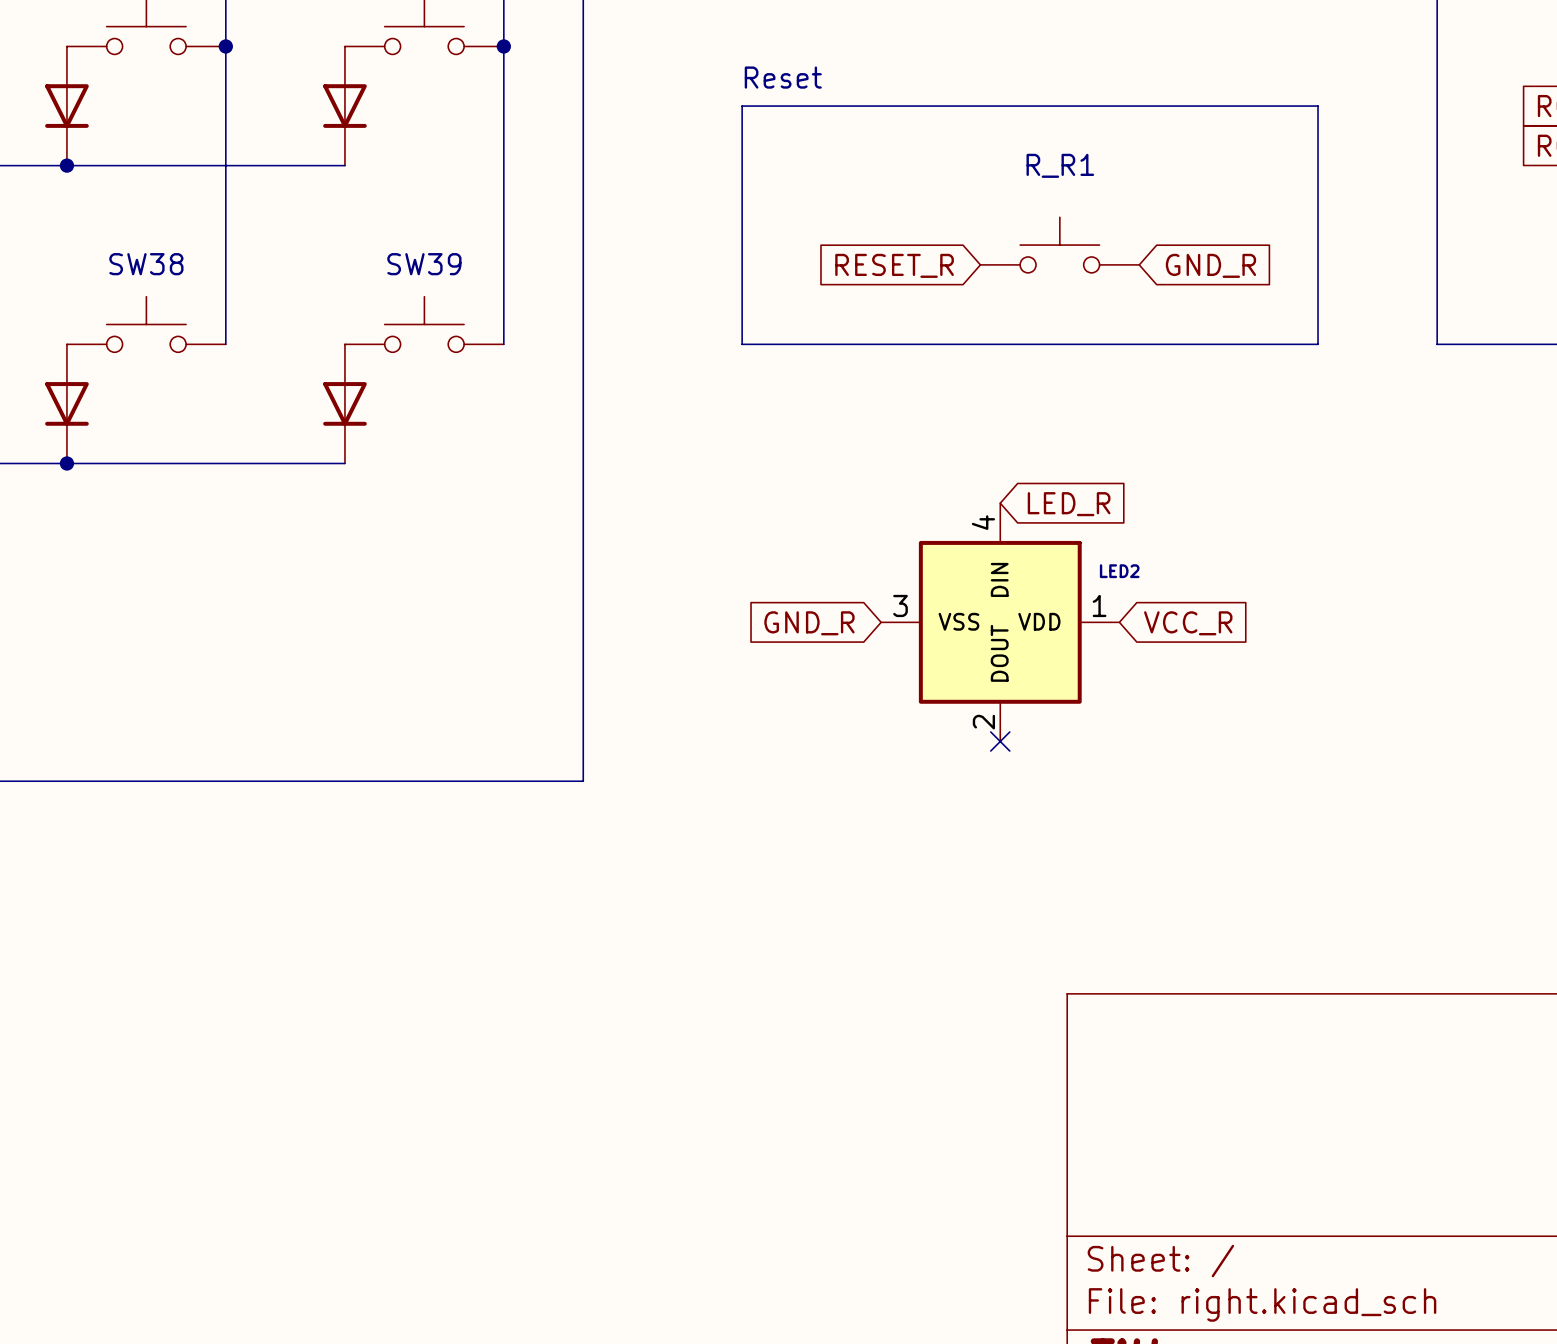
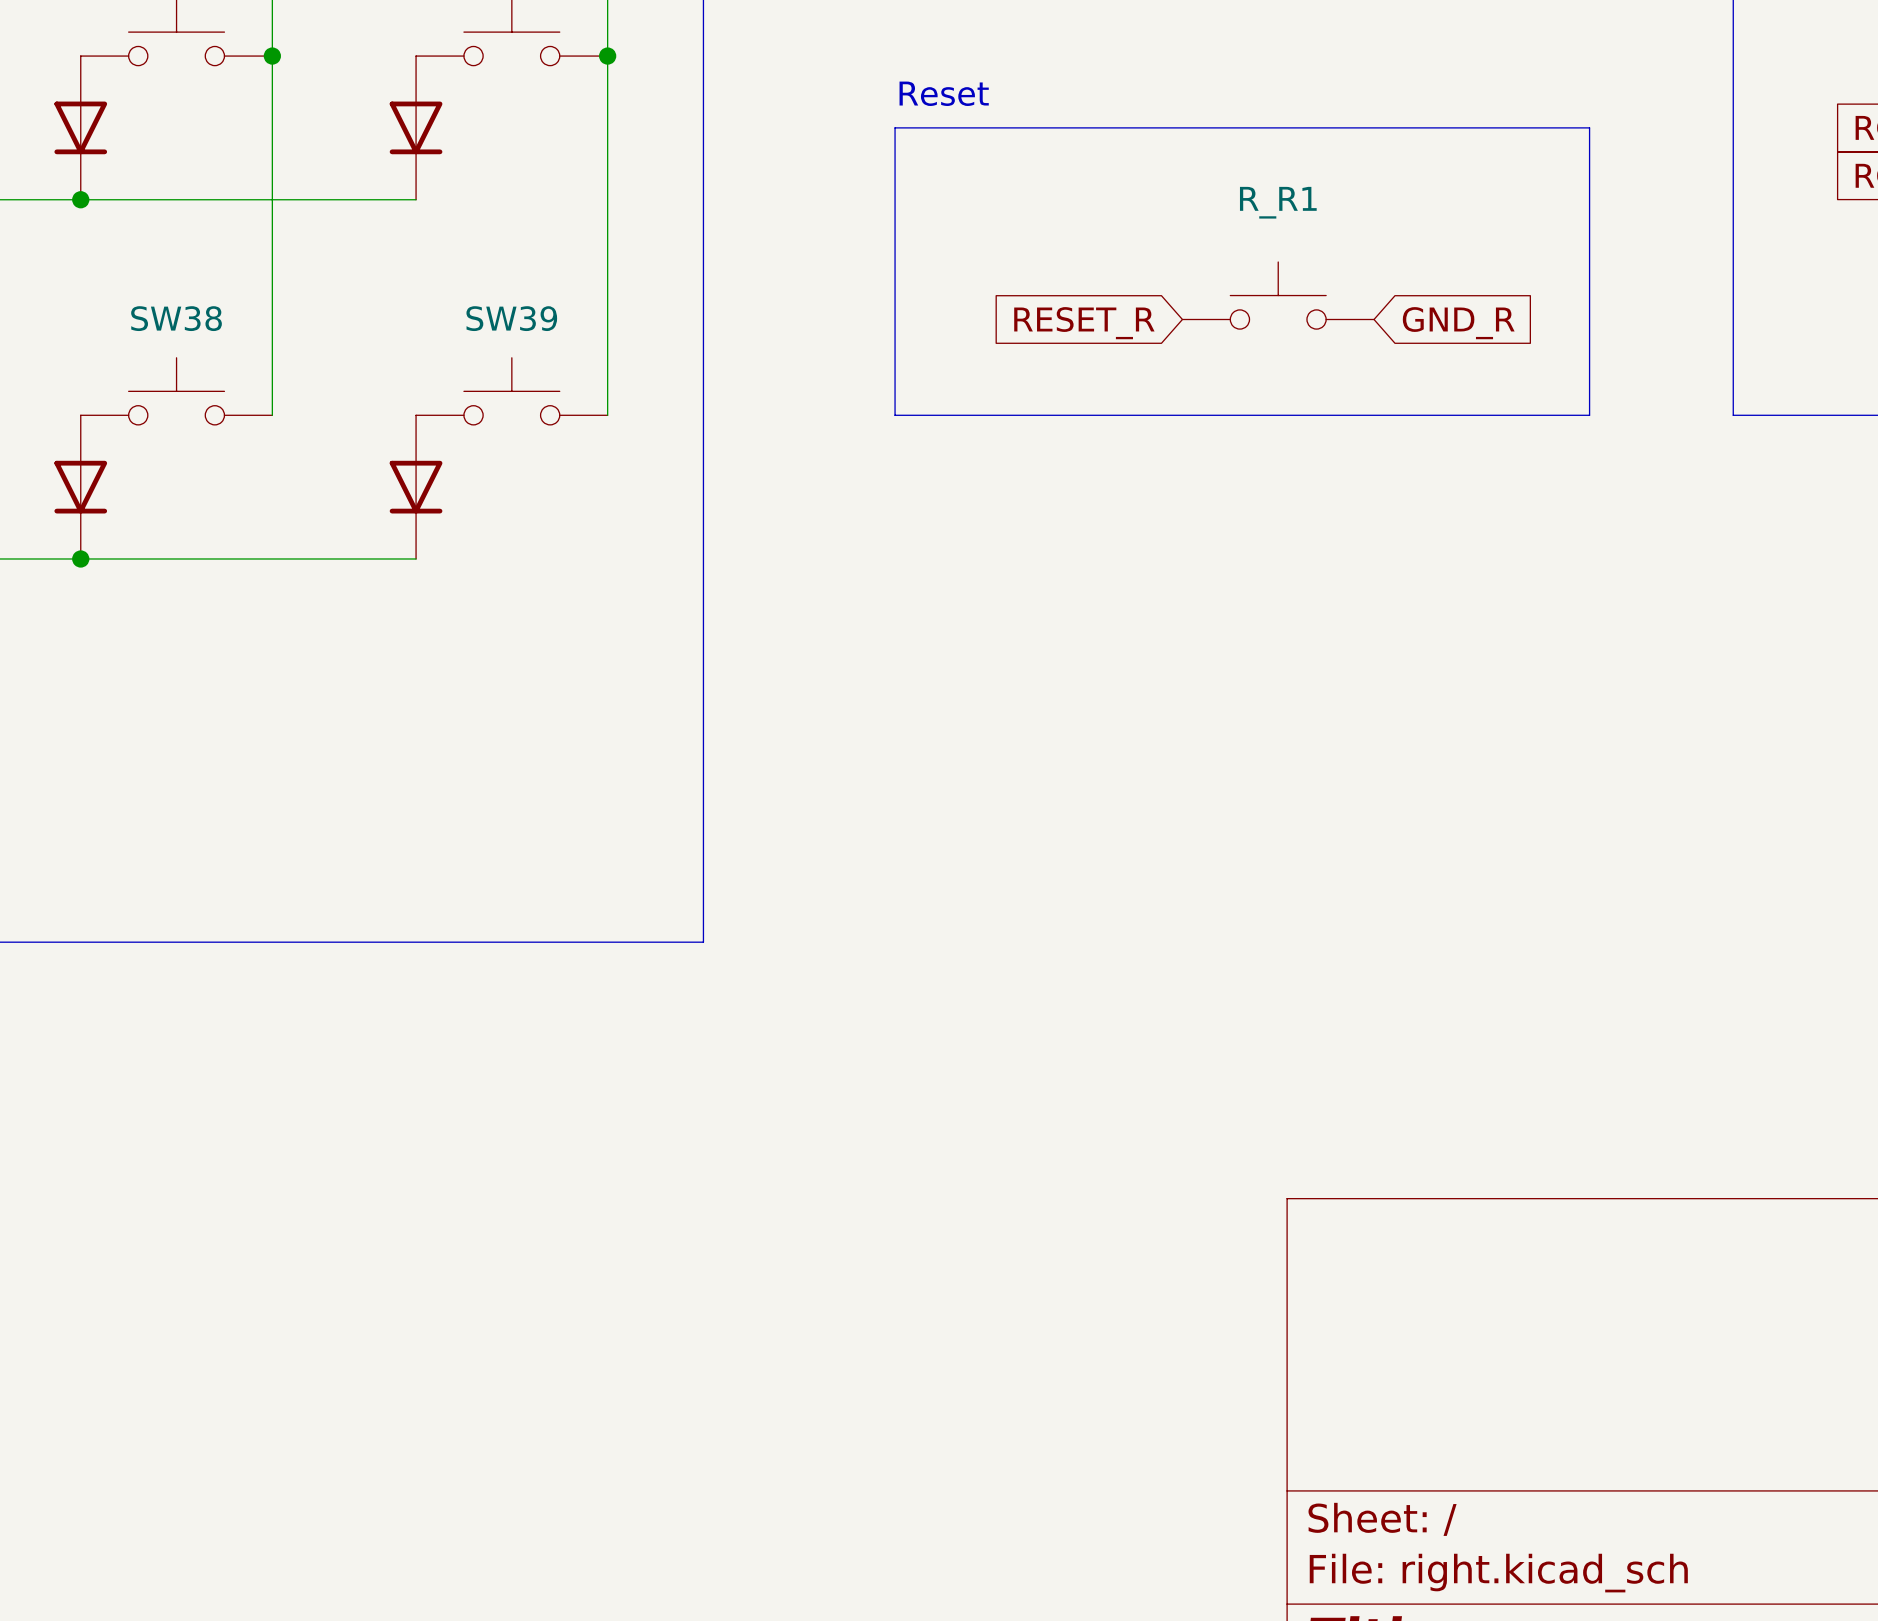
global label: LED_R (1069, 504) -> none
LED2: (1000, 622) -> none
global label: GND_R (809, 623) -> none
global label: VCC_R (1188, 623) -> none
no-connect mark: (1000, 741) -> none

